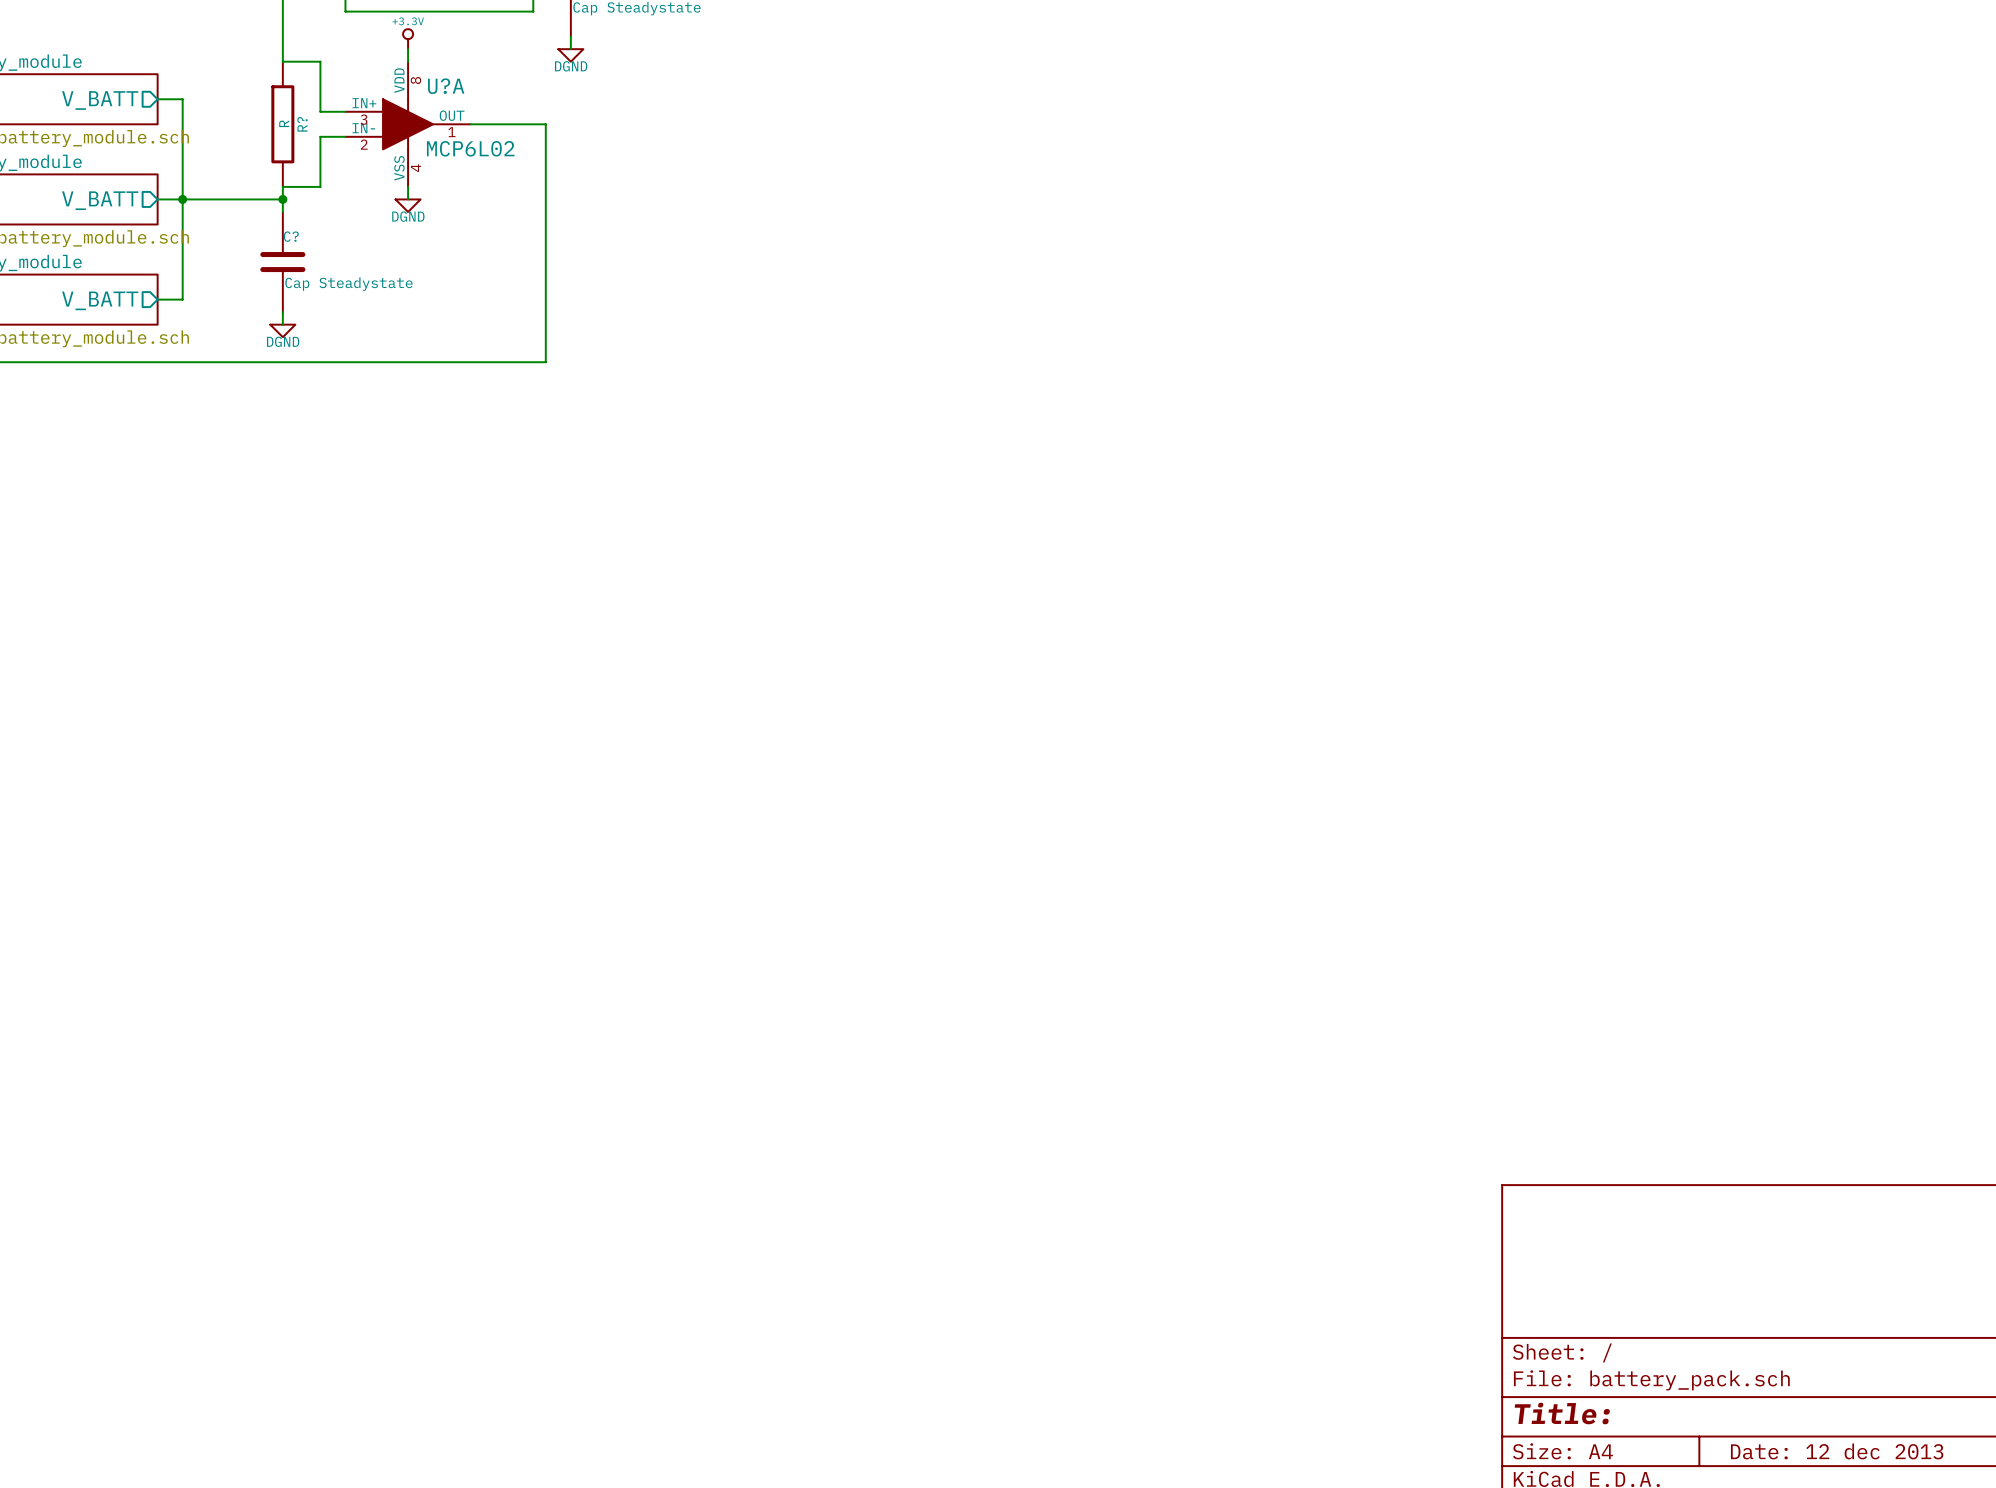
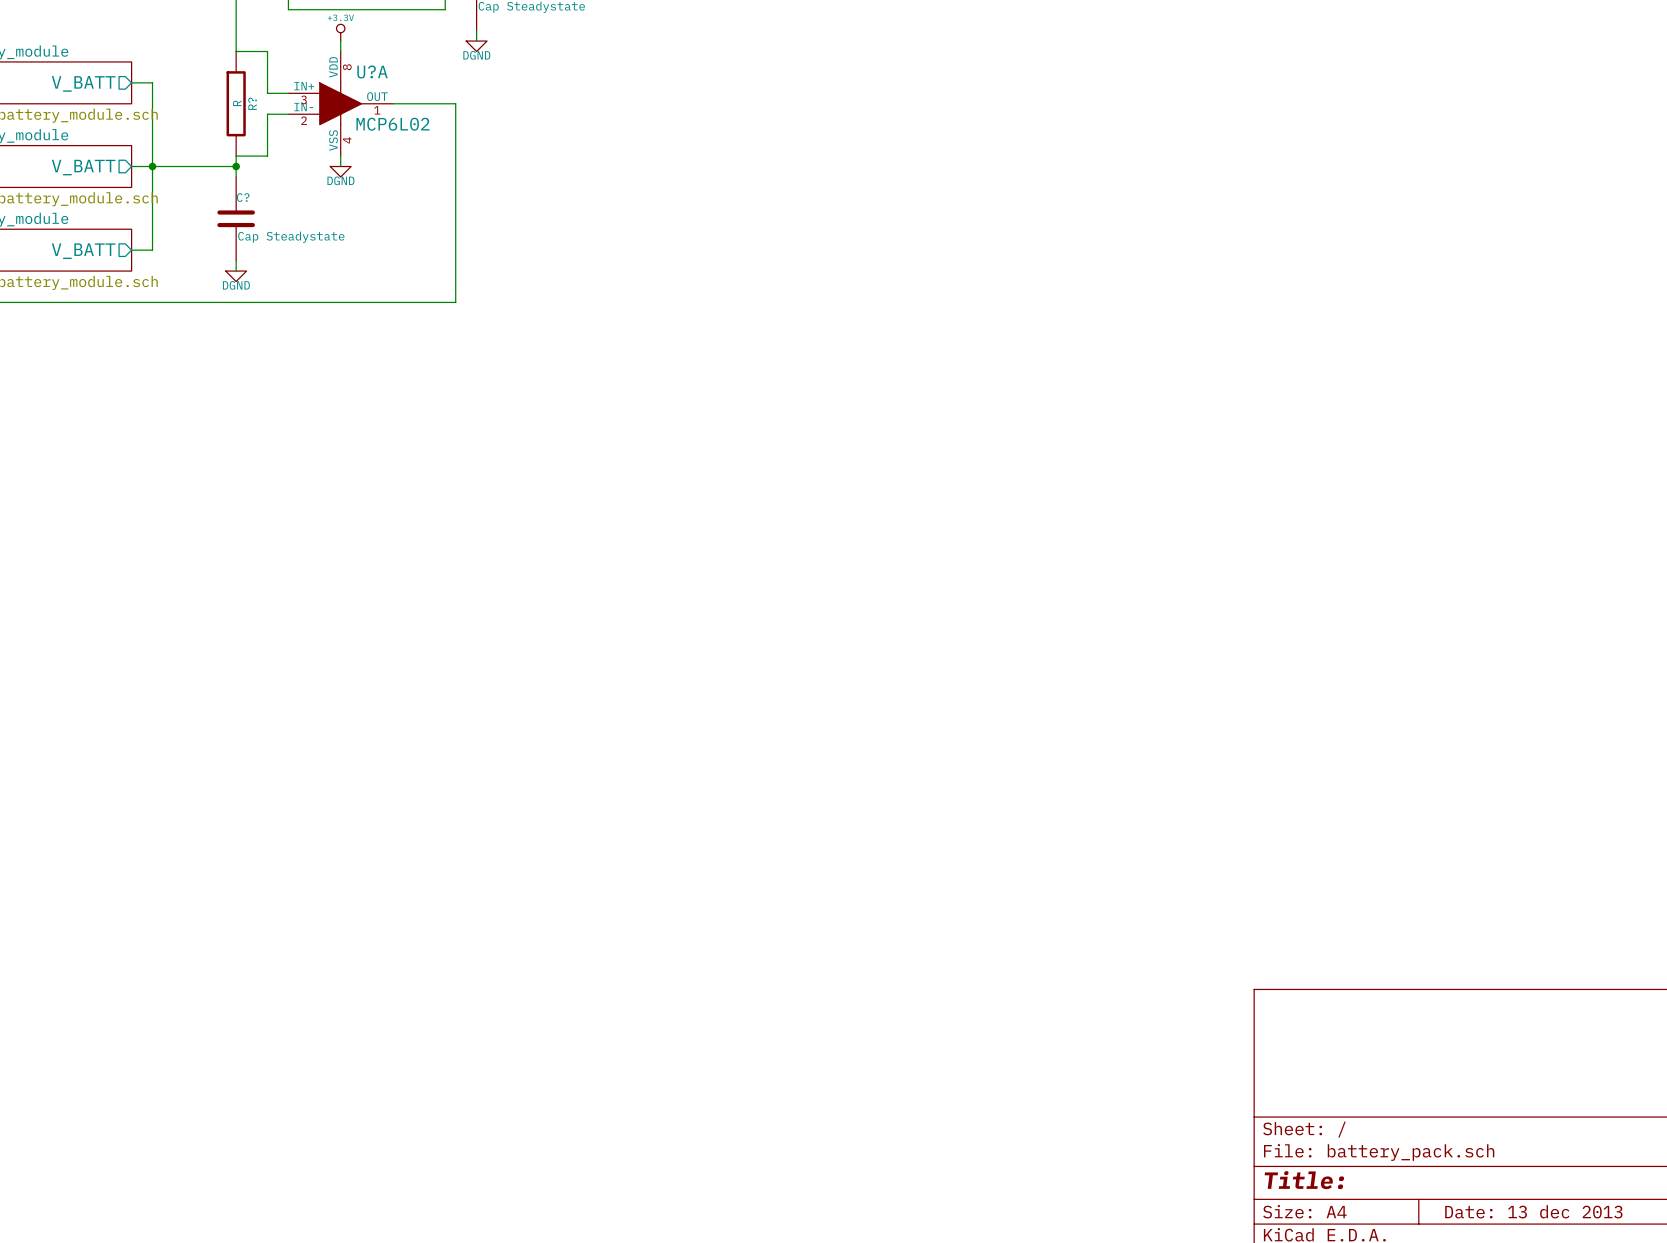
title block: Date: 12 dec 2013 (1837, 1451) -> Date: 13 dec 2013 (1533, 1211)

